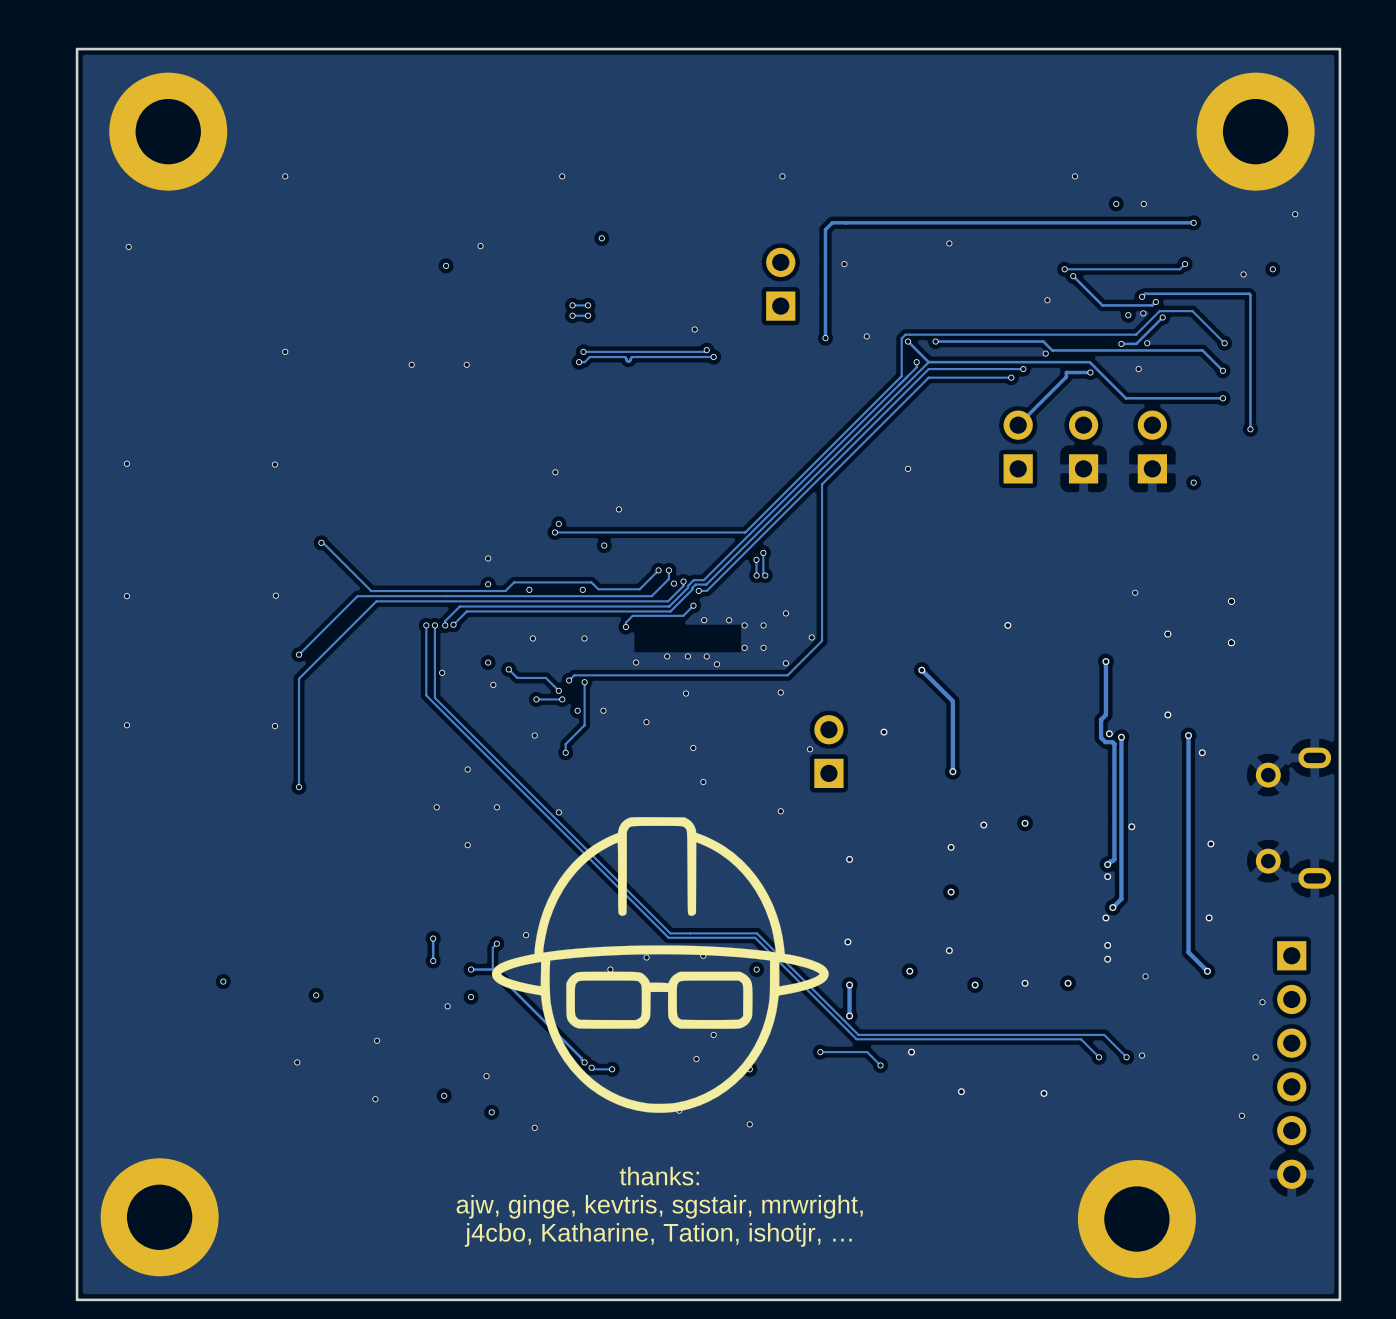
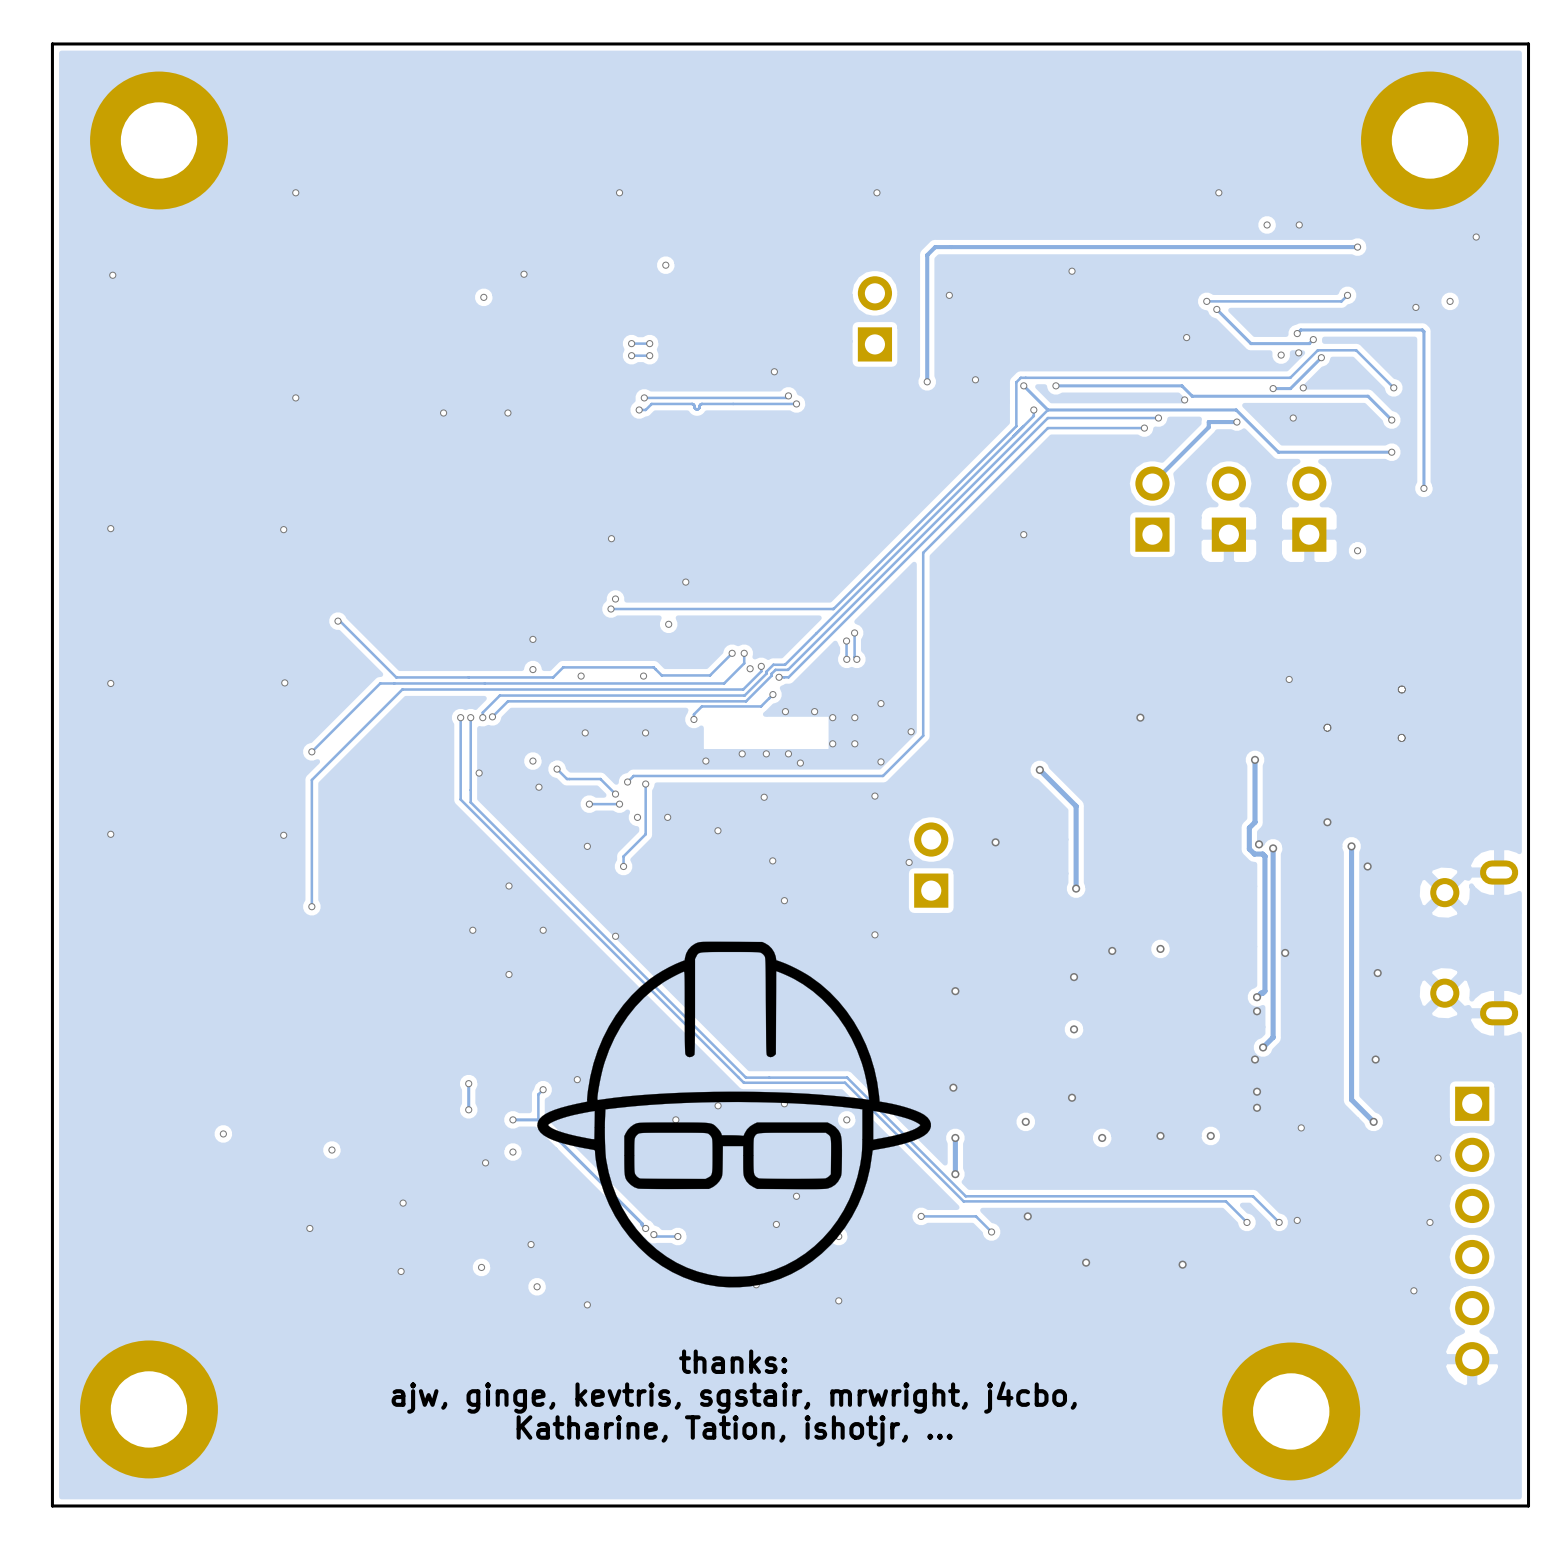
text: ajw, ginge, kevtris, sgstair, mrwright, (659, 1206) -> ajw, ginge, kevtris, sgstair, mrwright, j4cbo, (734, 1397)
text: j4cbo, Katharine, Tation, ishotjr, … (658, 1234) -> Katharine, Tation, ishotjr, … (734, 1430)

